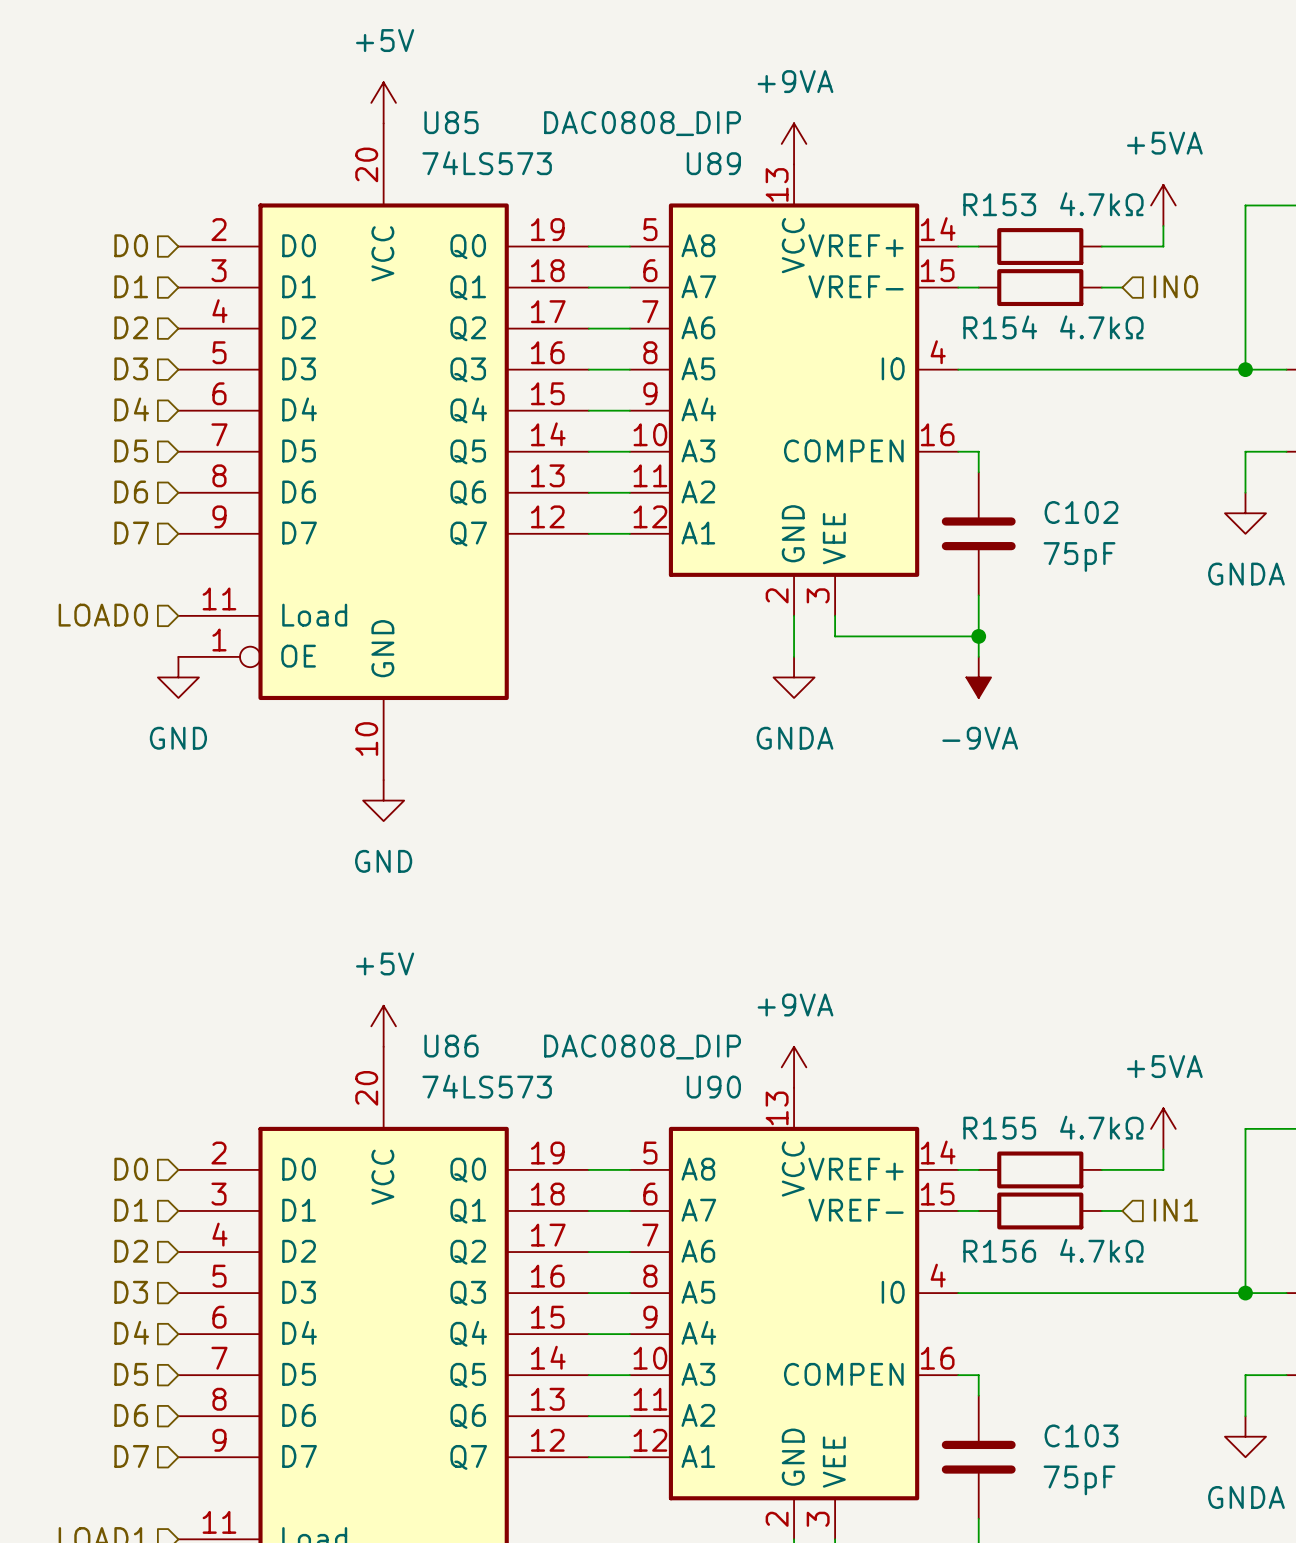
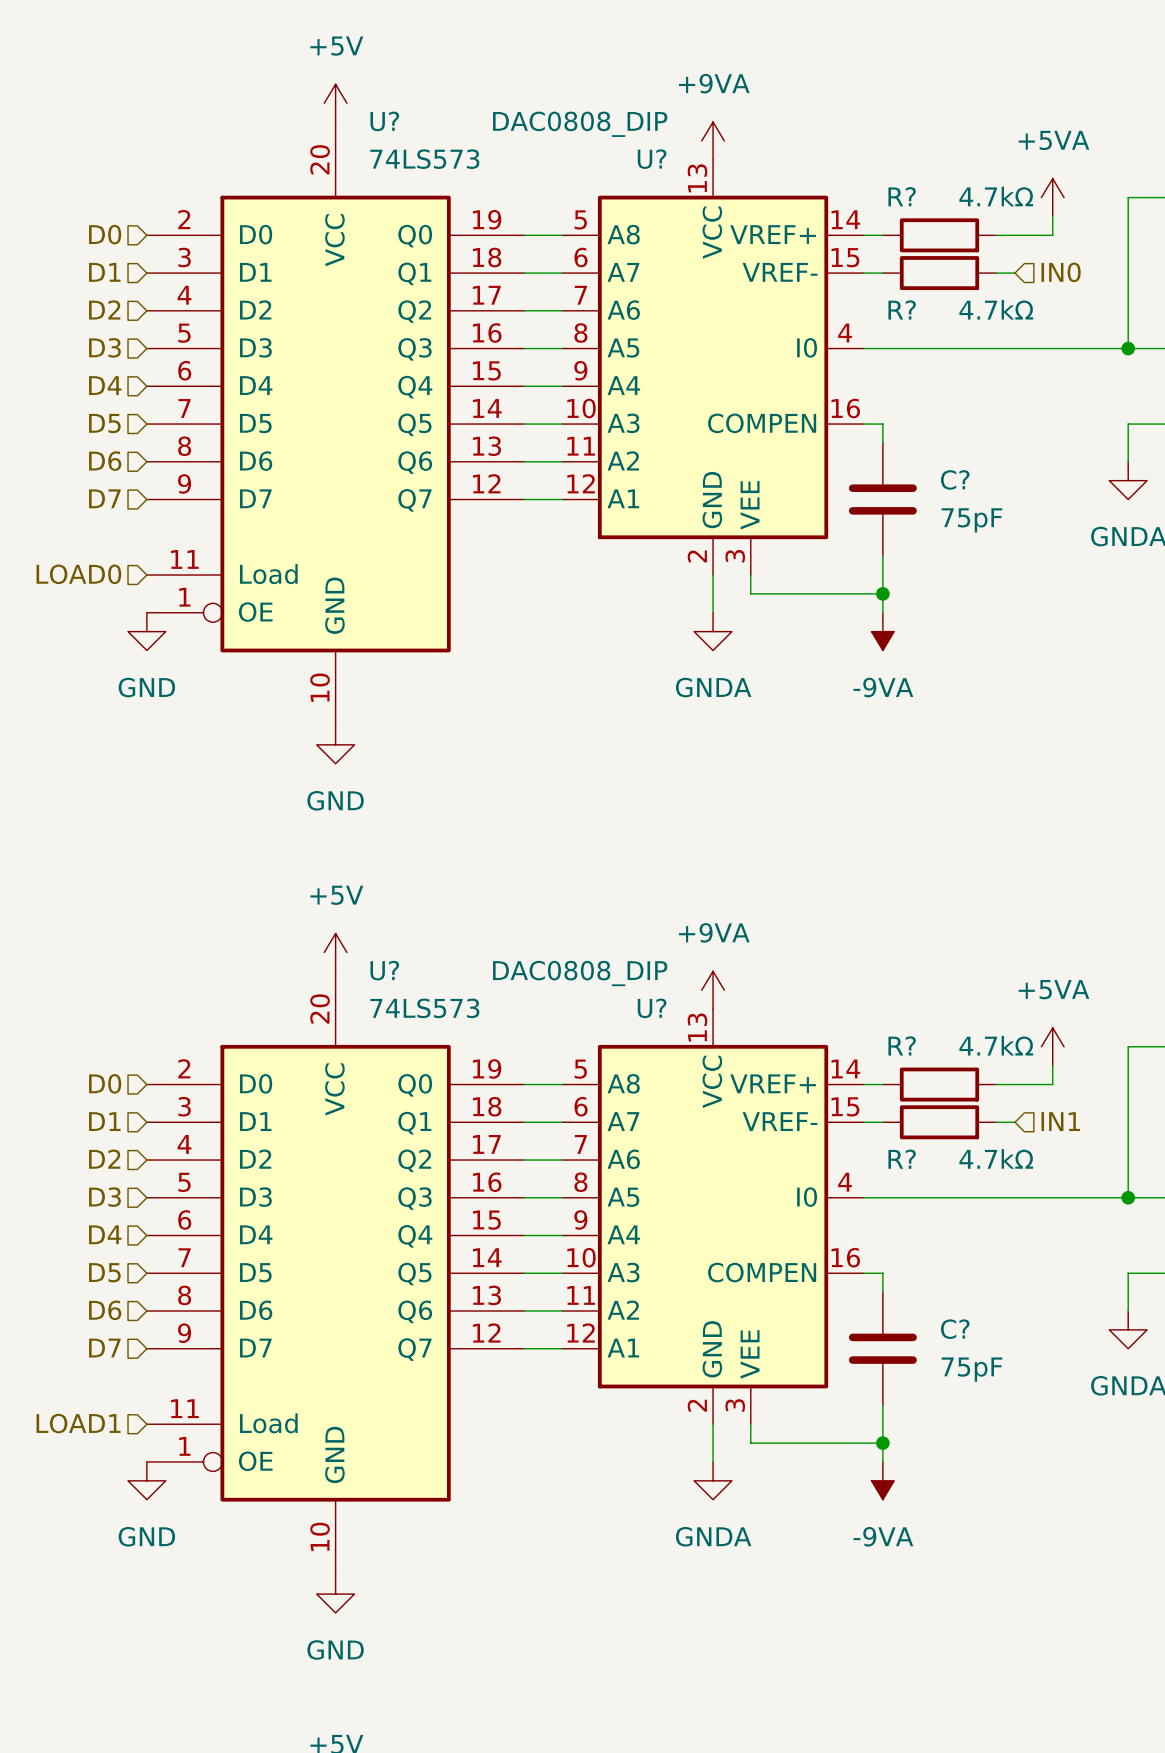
U85 name: U85 (451, 122) -> U? (384, 121)
U89 name: U89 (713, 163) -> U? (652, 159)
R153 name: R153 (999, 204) -> R? (902, 196)
R154 name: R154 (1000, 327) -> R? (902, 309)
C102 name: C102 (1081, 512) -> C? (955, 479)
U86 name: U86 (451, 1046) -> U? (384, 970)
U90 name: U90 (713, 1087) -> U? (652, 1008)
R155 name: R155 (999, 1128) -> R? (902, 1045)
R156 name: R156 (999, 1251) -> R? (902, 1159)
C103 name: C103 (1081, 1435) -> C? (955, 1329)

